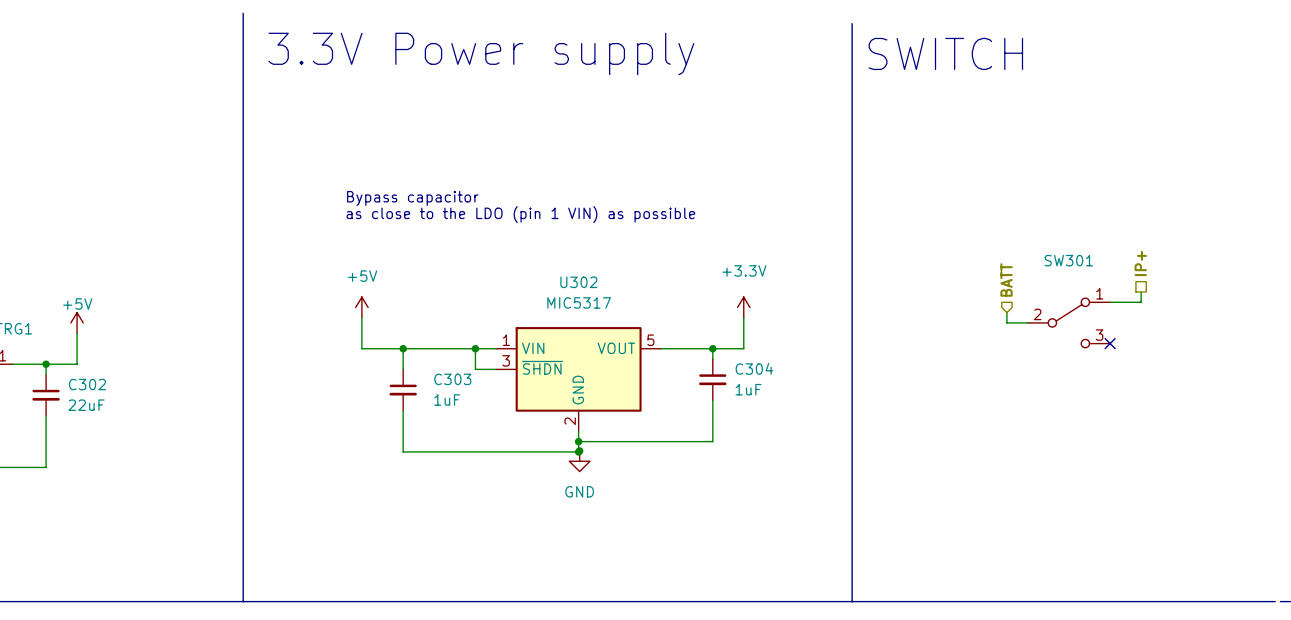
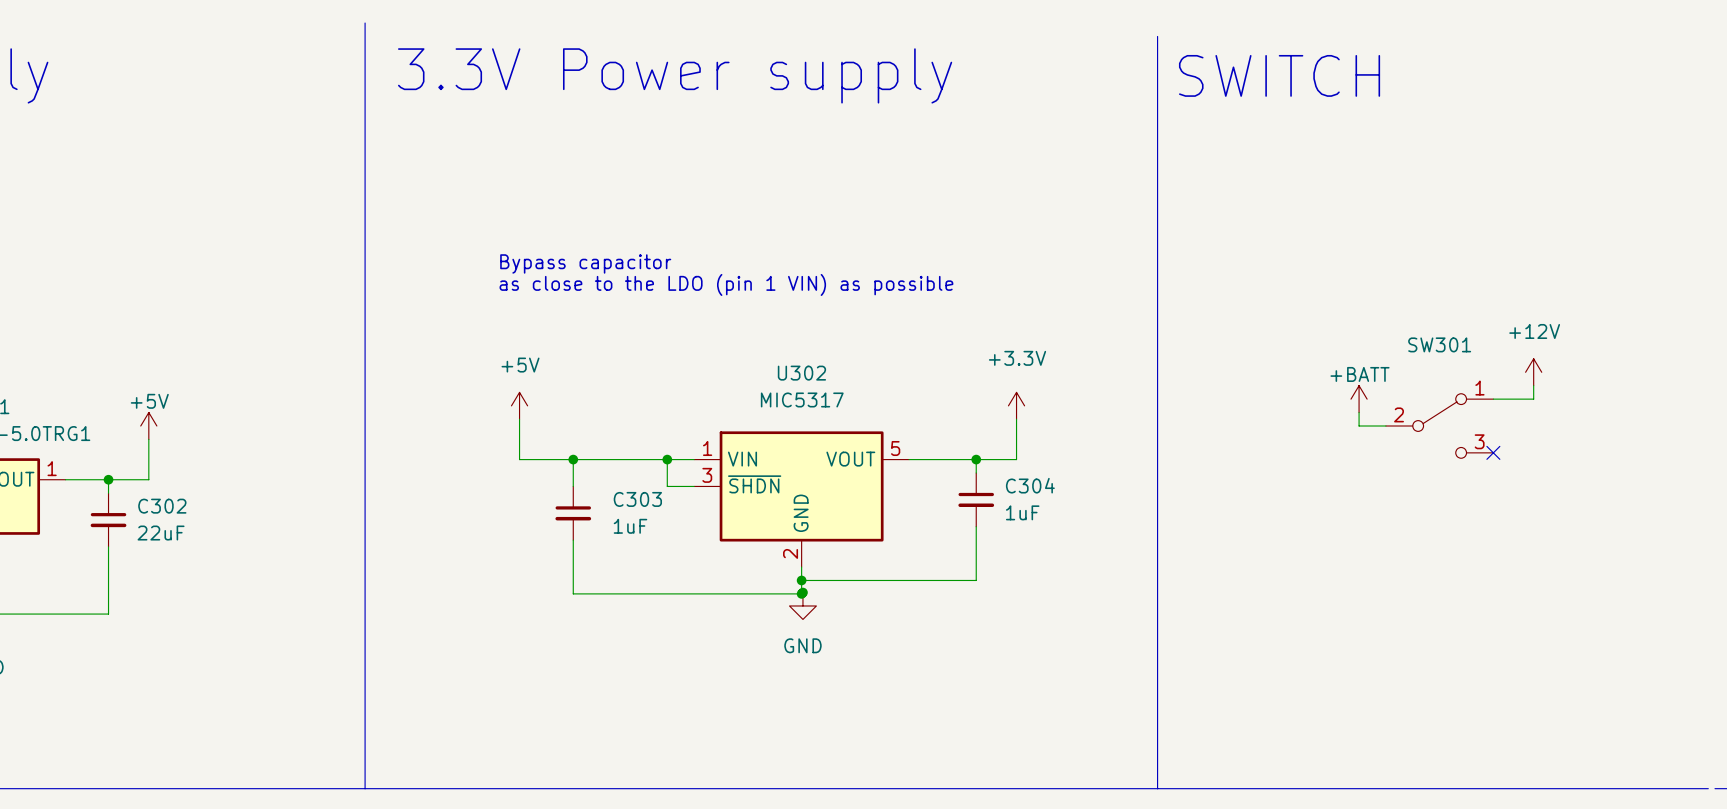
hierarchical label: IP+ (1140, 263) -> none
hierarchical label: BATT (1006, 279) -> none
power symbol: none -> +12V (1533, 372)
power symbol: none -> +BATT (1359, 399)

